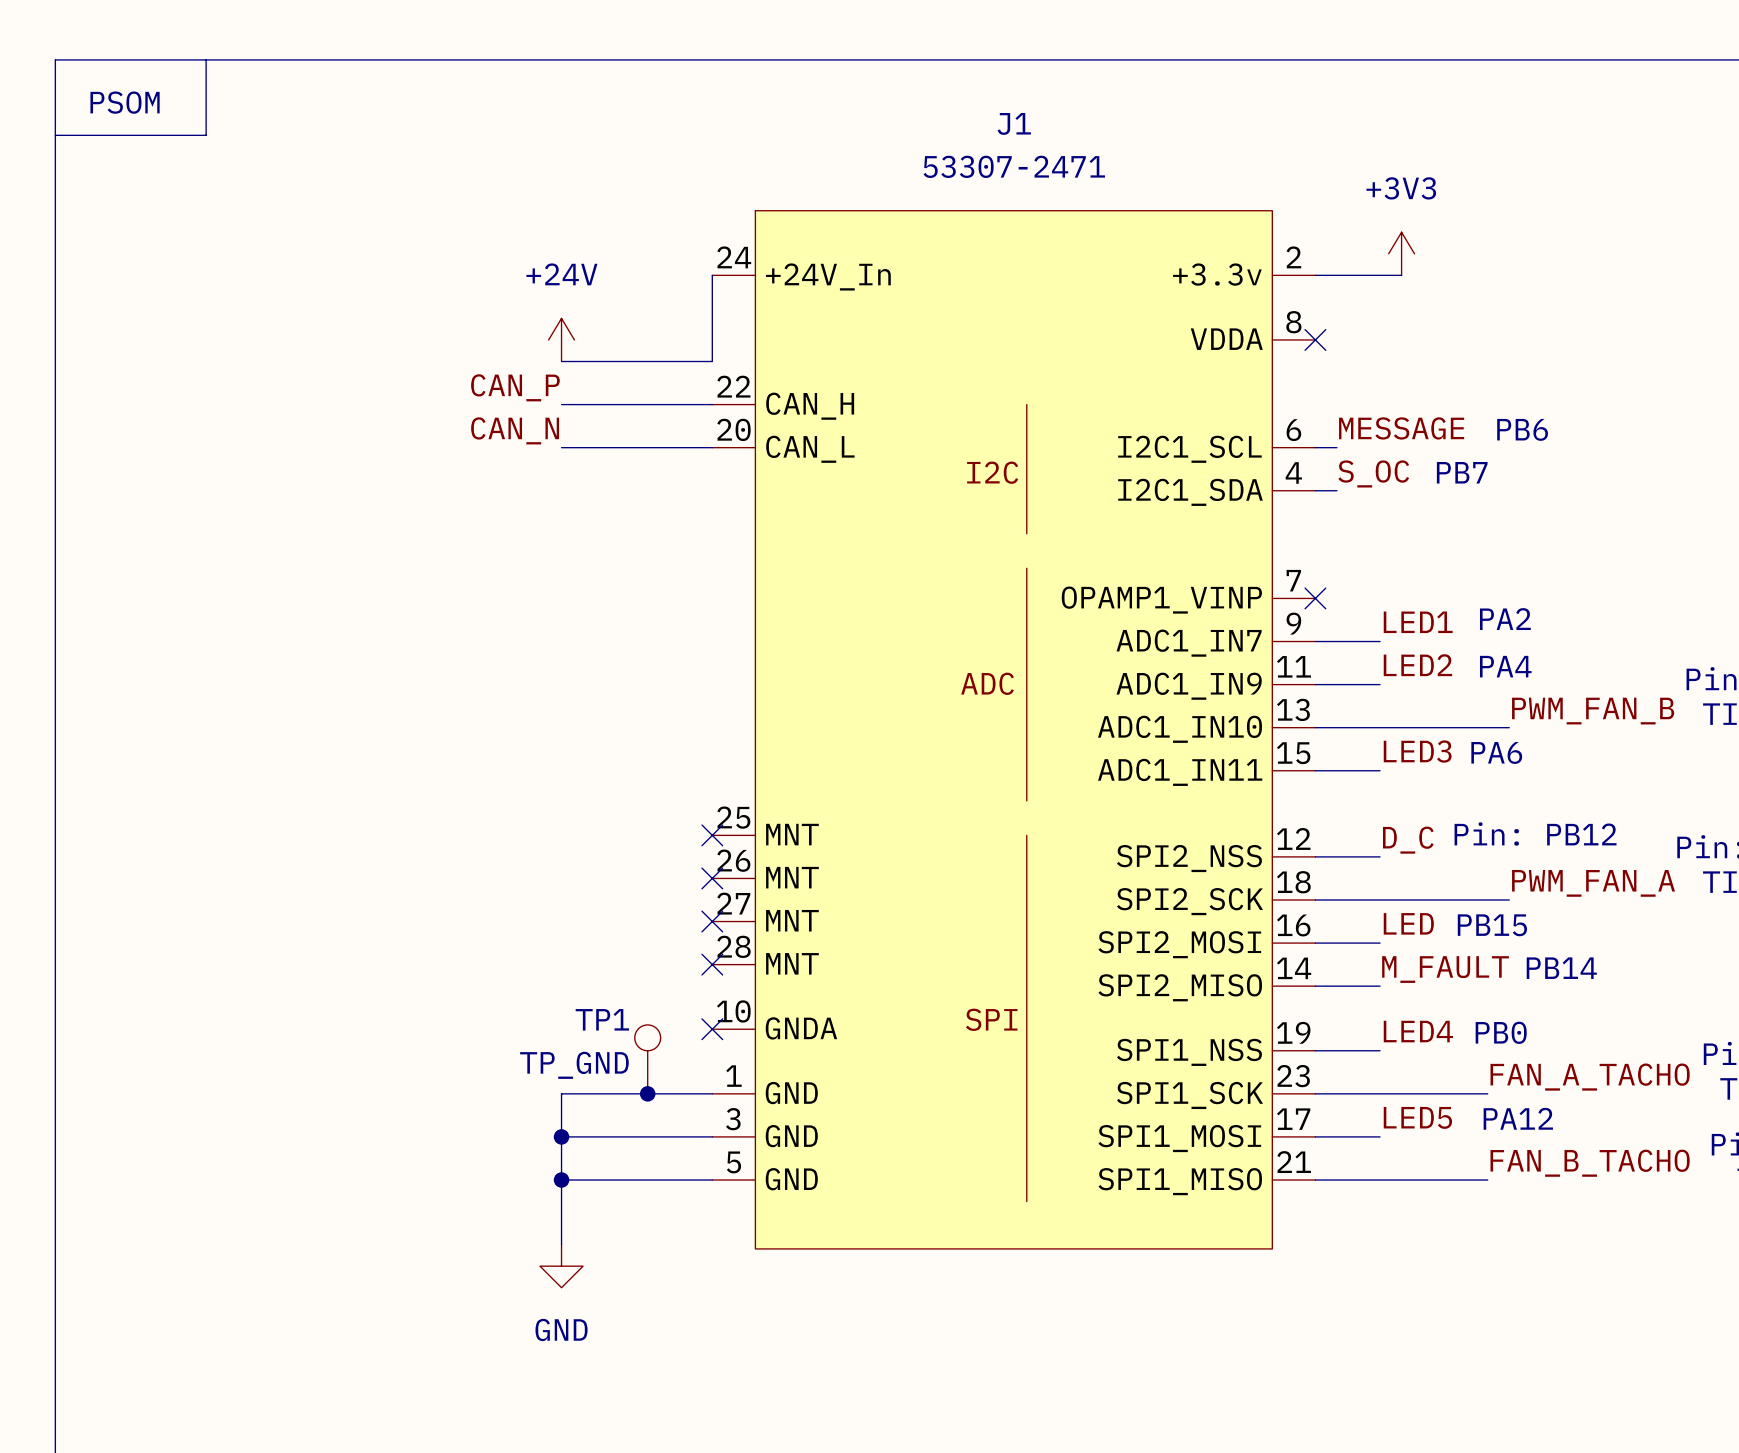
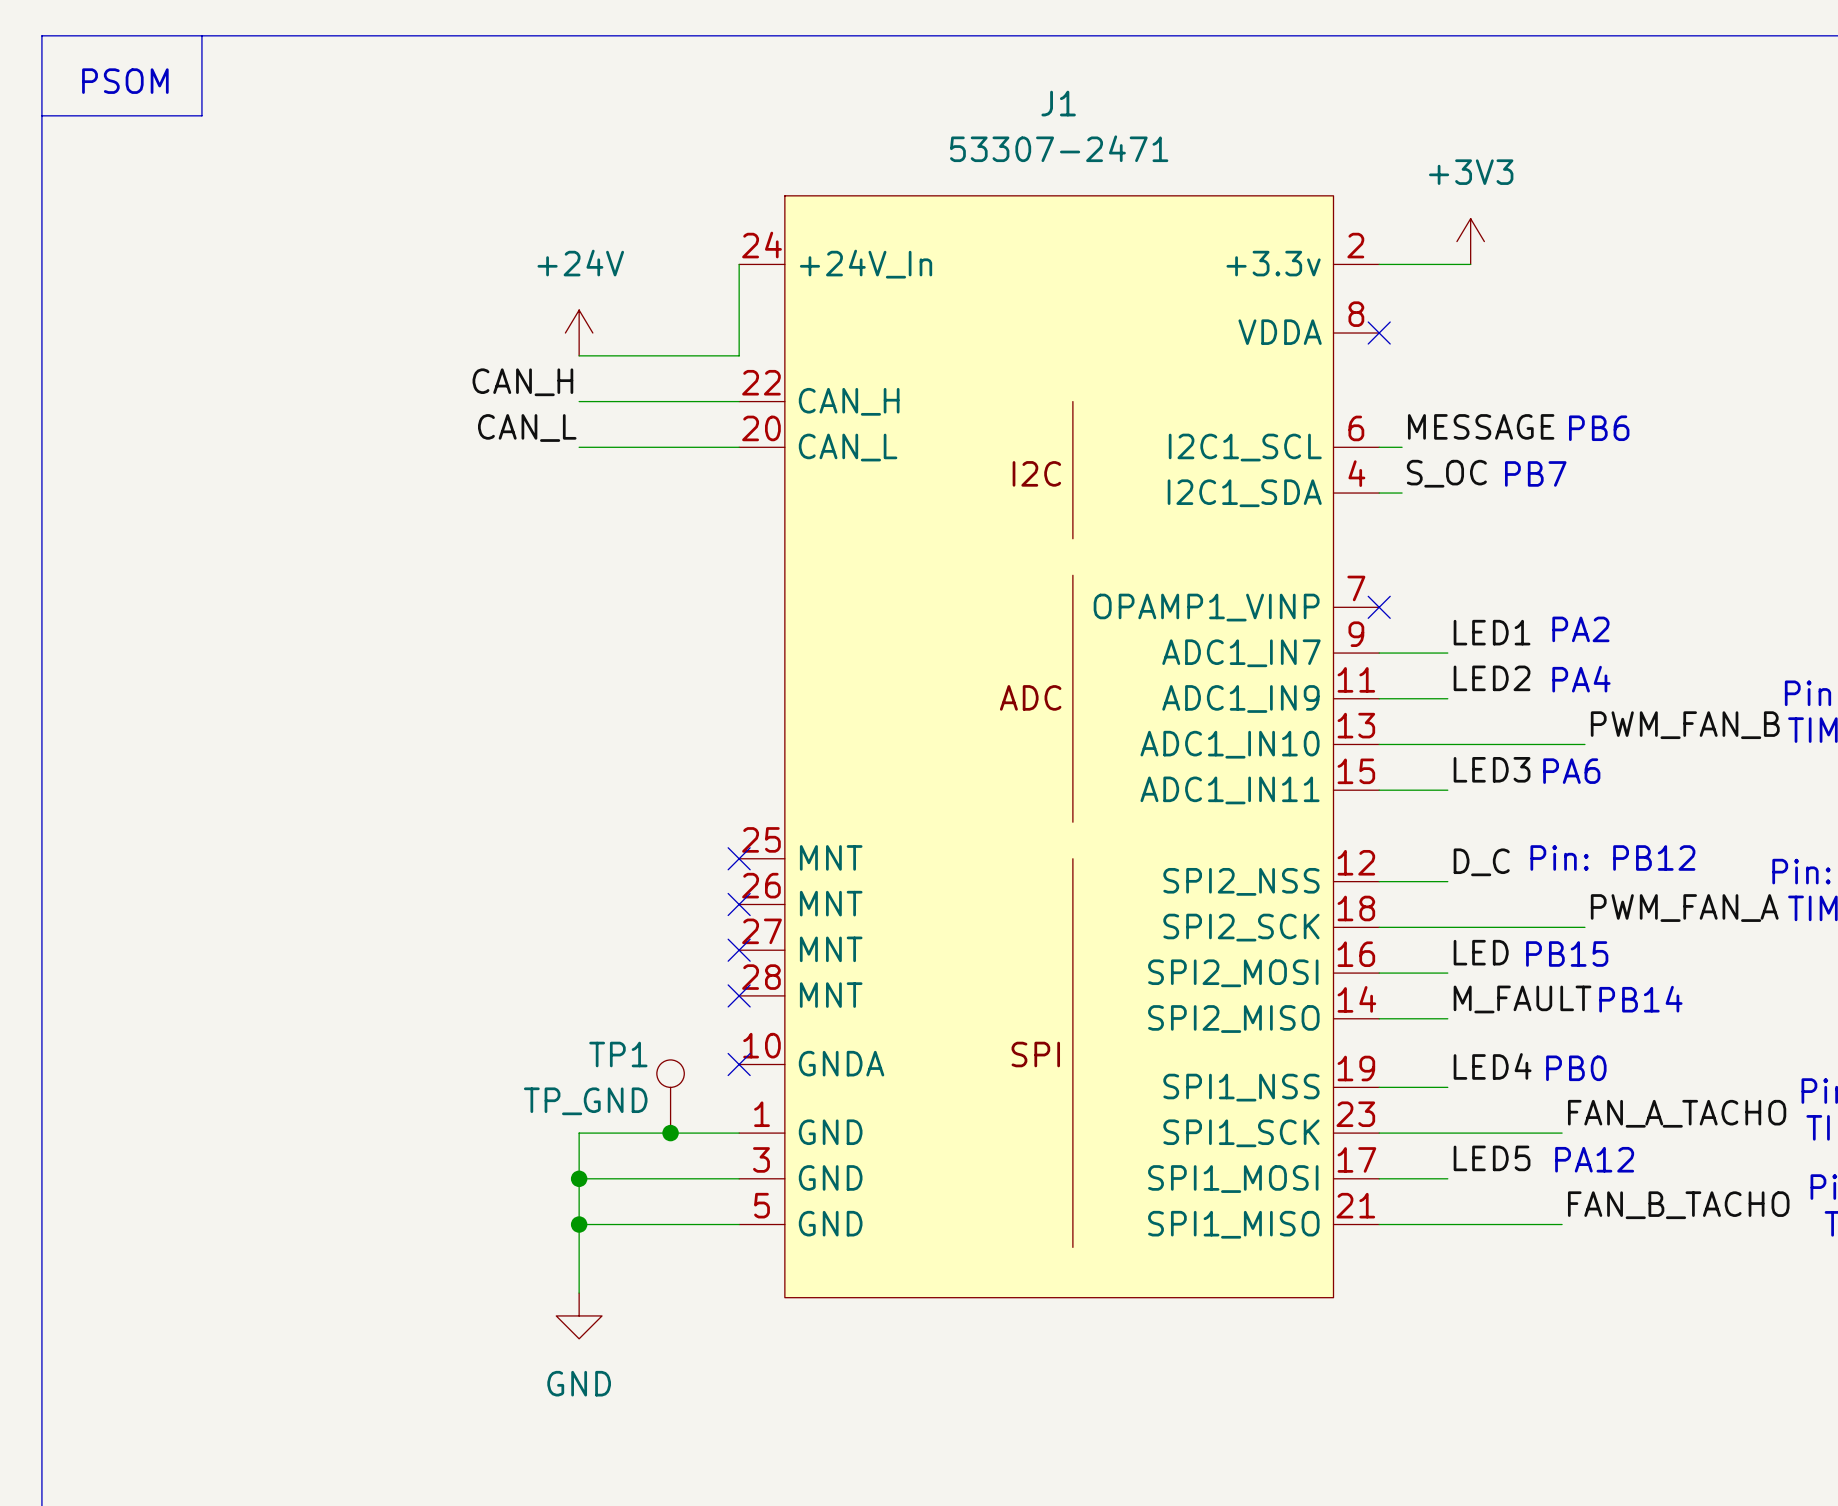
label: CAN_P (515, 387) -> CAN_H (522, 382)
label: CAN_N (515, 430) -> CAN_L (527, 427)

